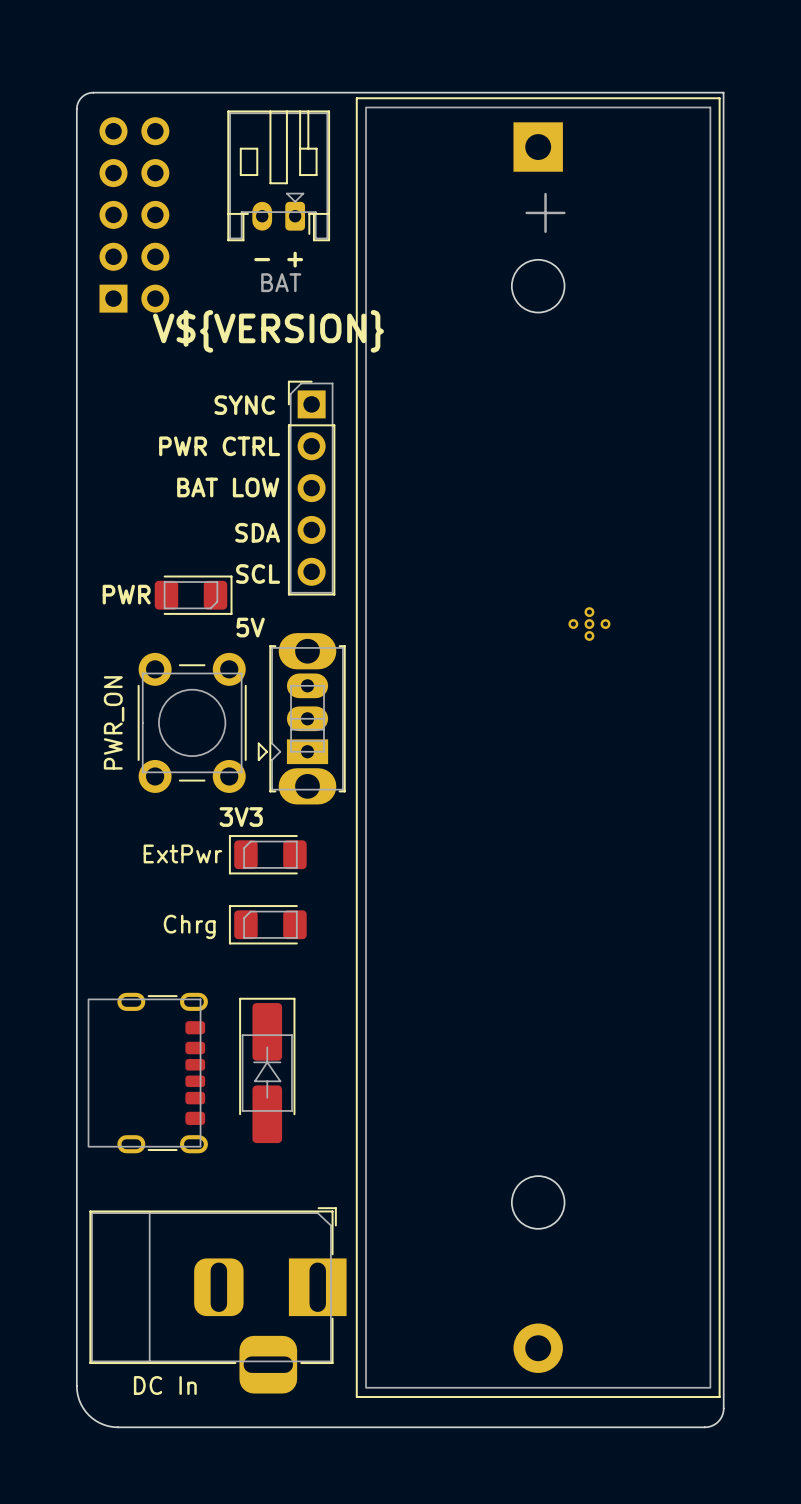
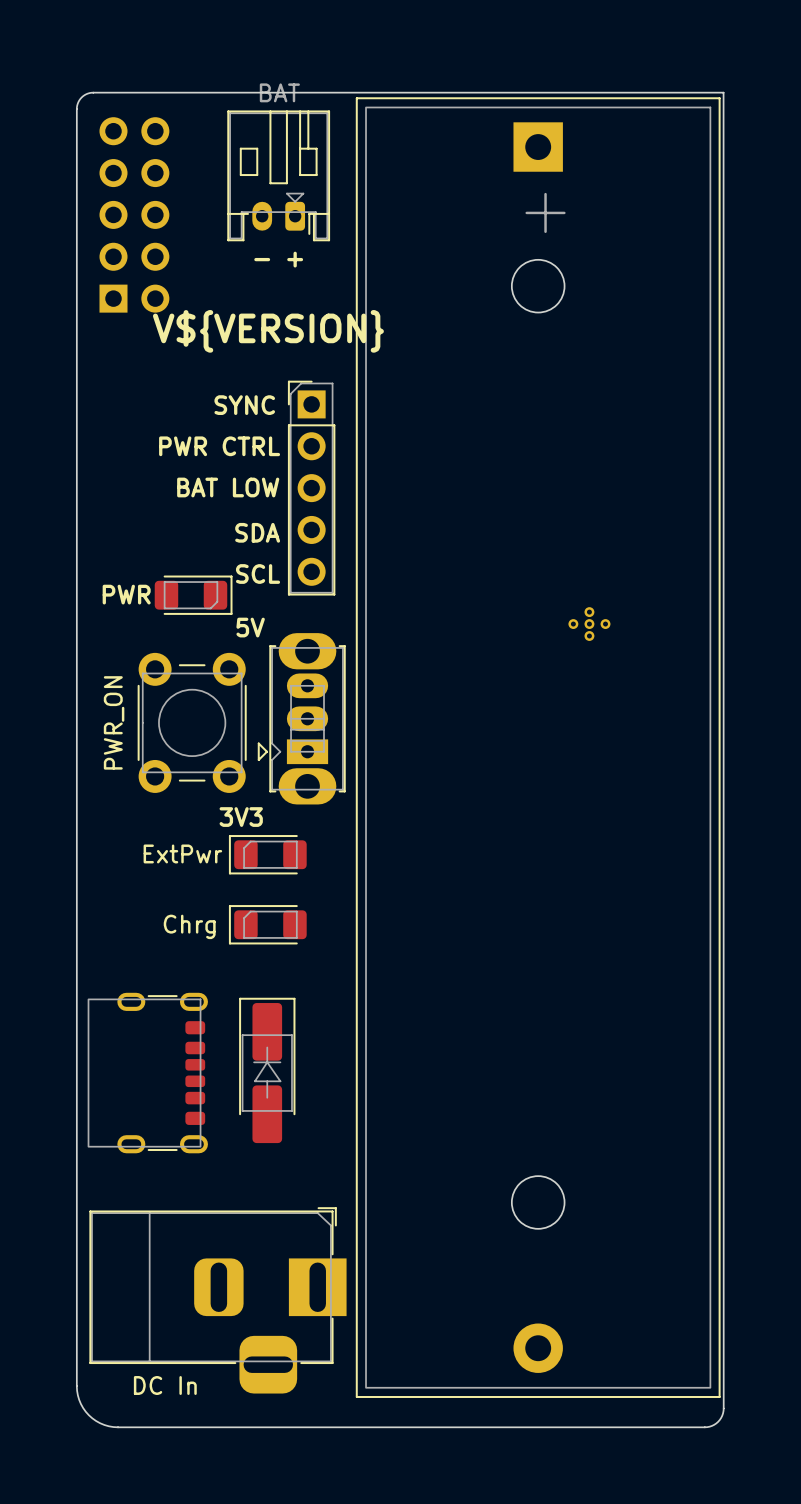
part value position: BAT (281, 282) -> BAT (279, 92)

